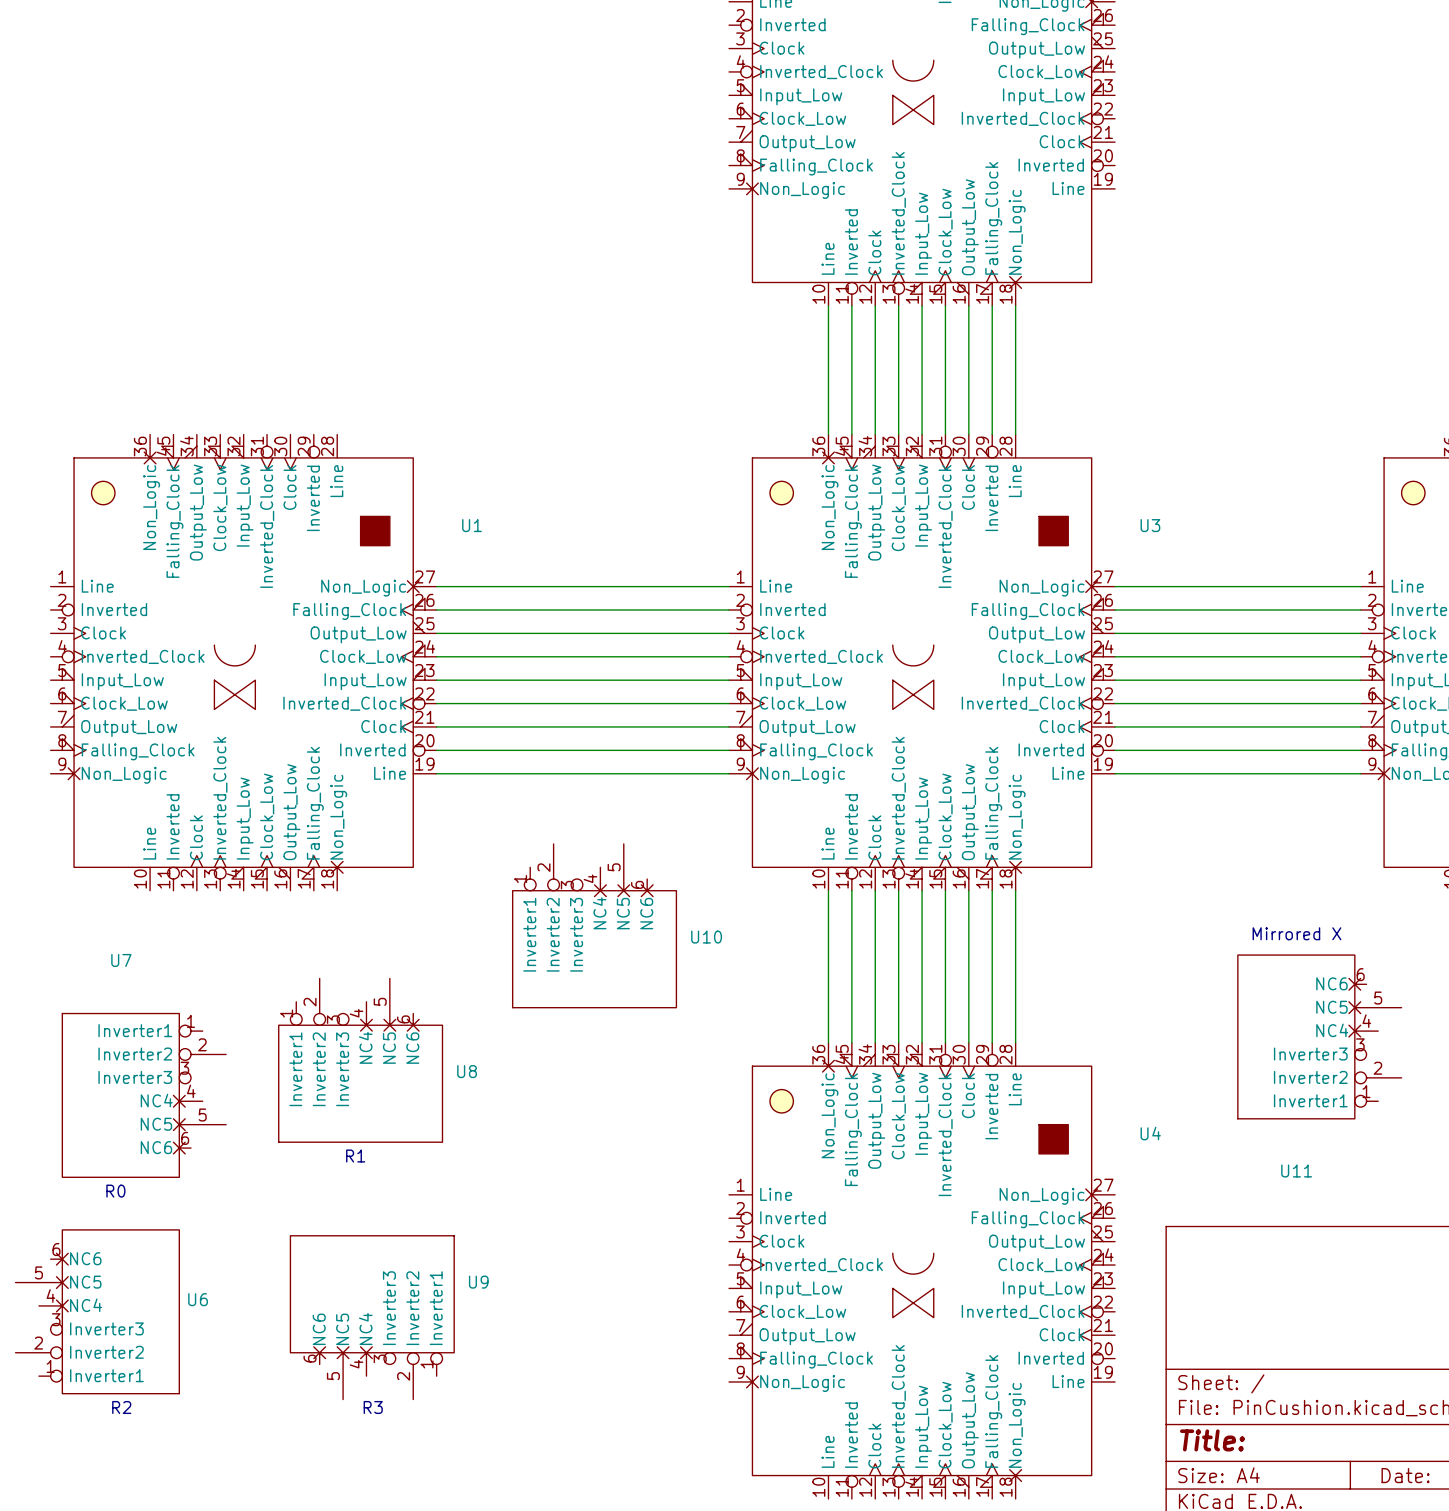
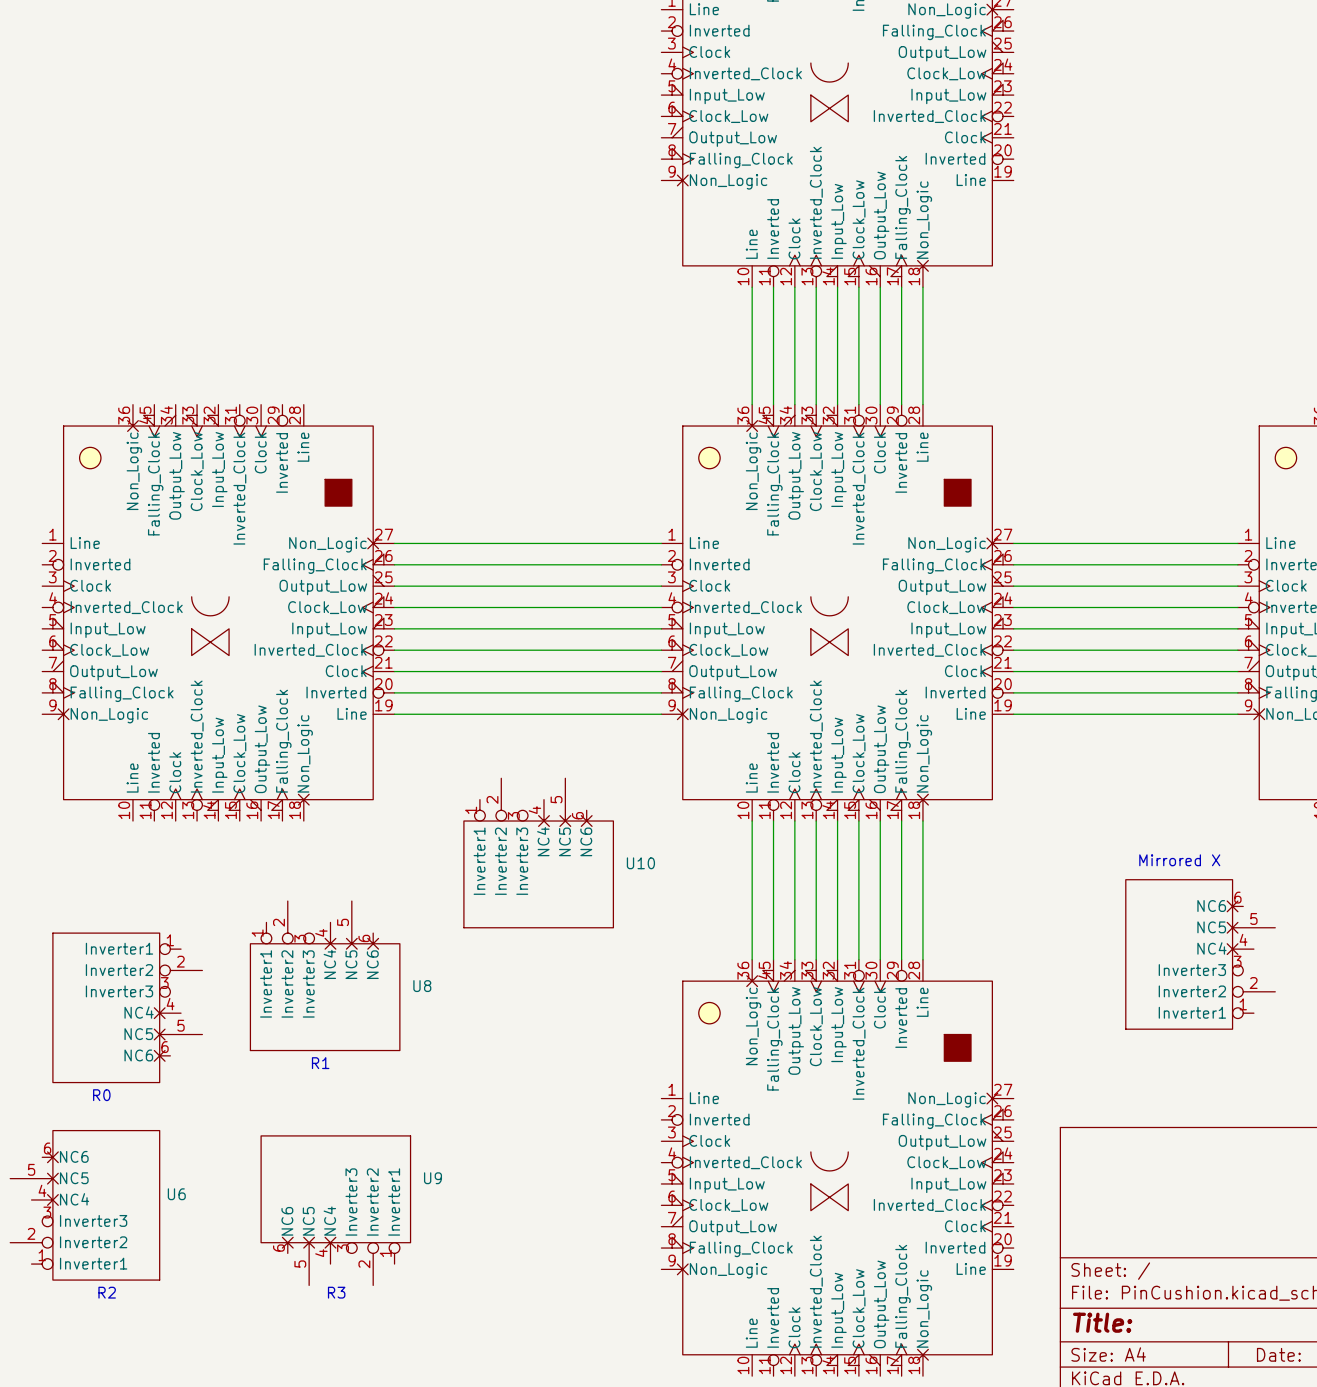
U1 name: U1 (472, 525) -> none
U3 name: U3 (1150, 525) -> none
U7 name: U7 (121, 960) -> none
U4 name: U4 (1150, 1133) -> none
U11 name: U11 (1296, 1171) -> none

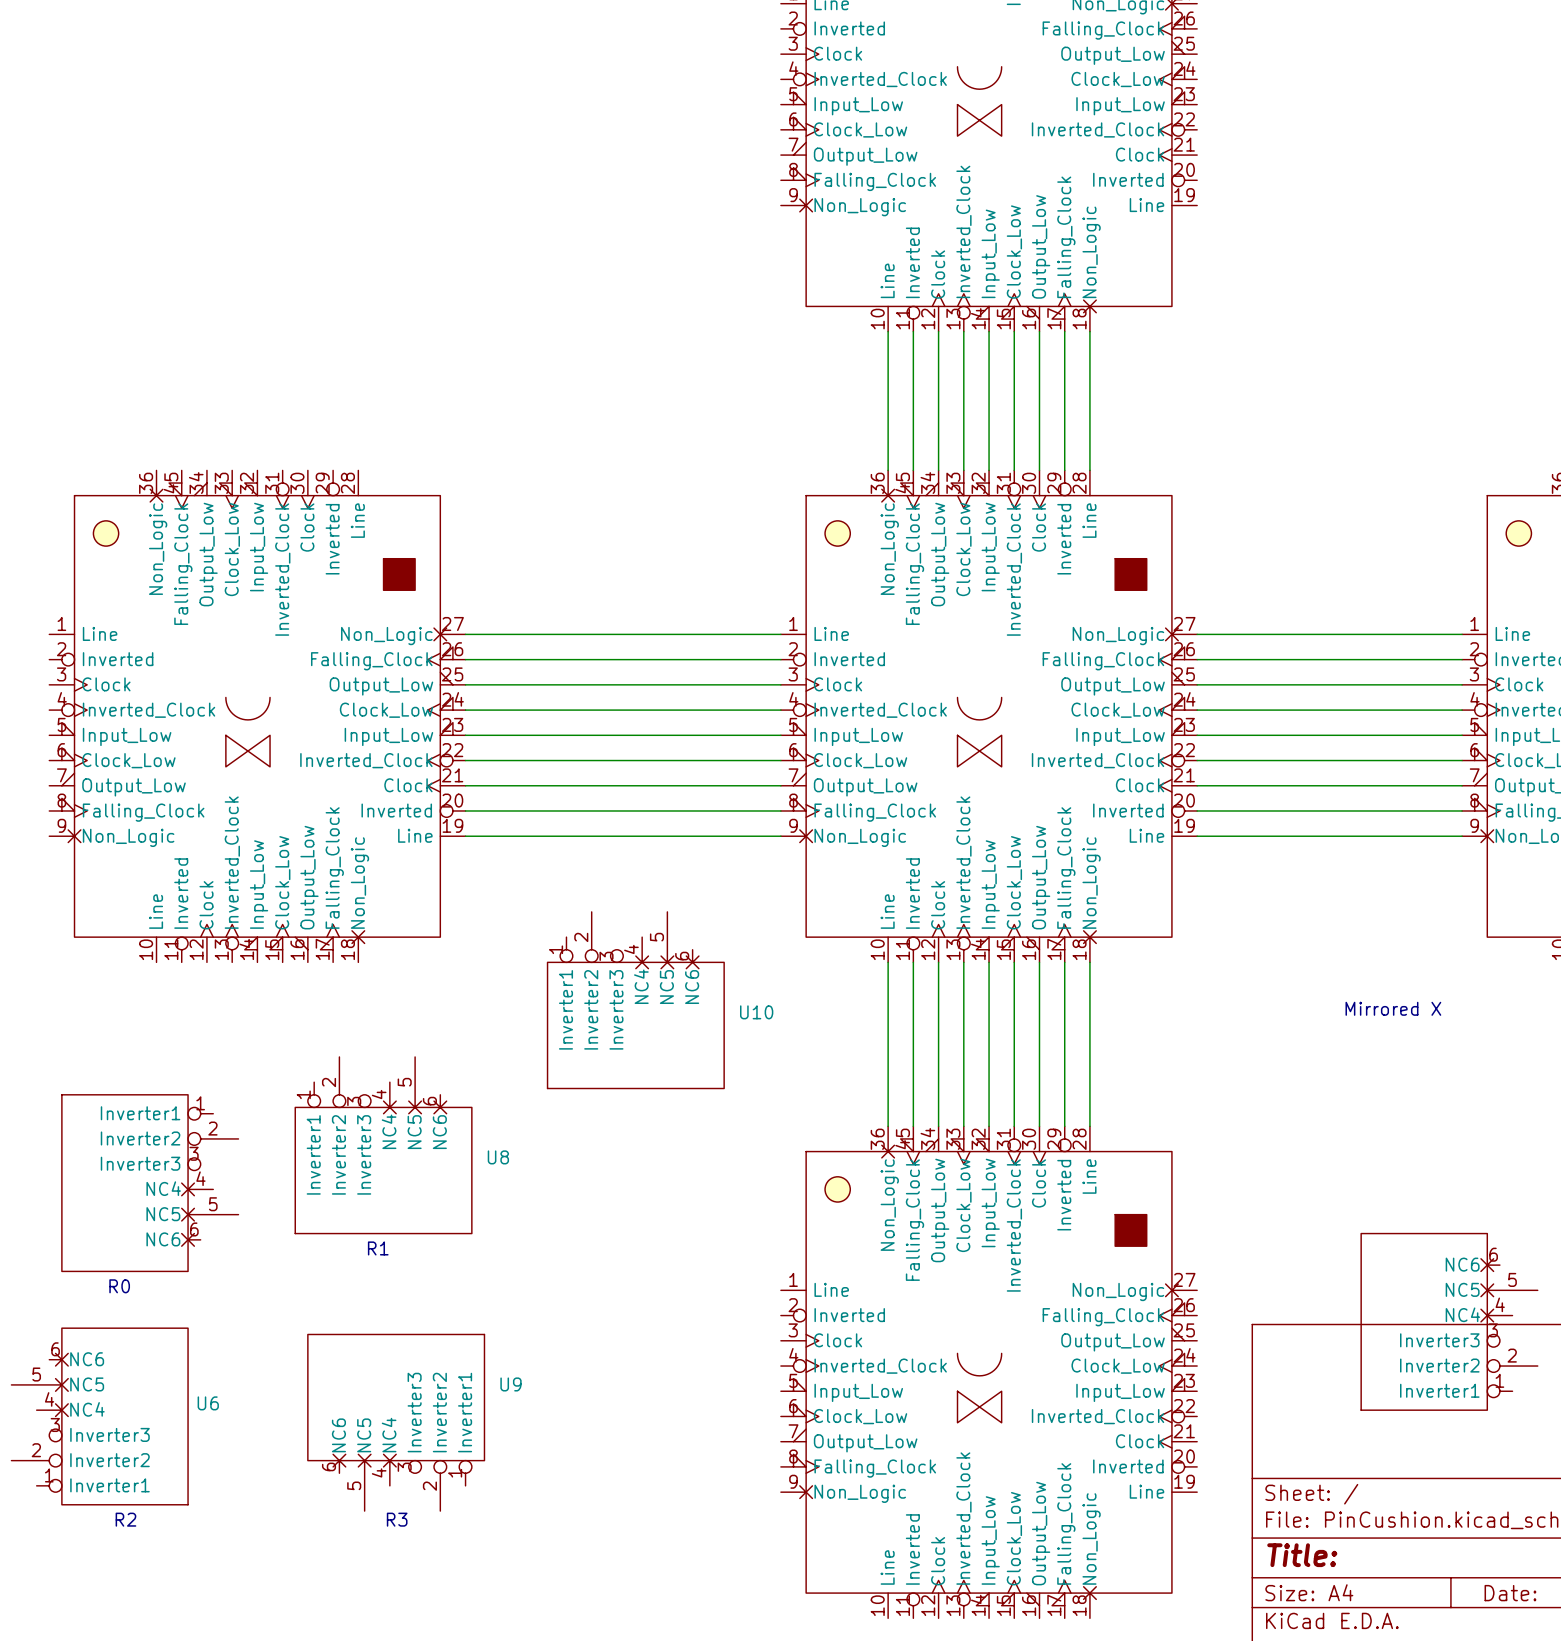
part position: (1200, 954) -> (1449, 1321)

